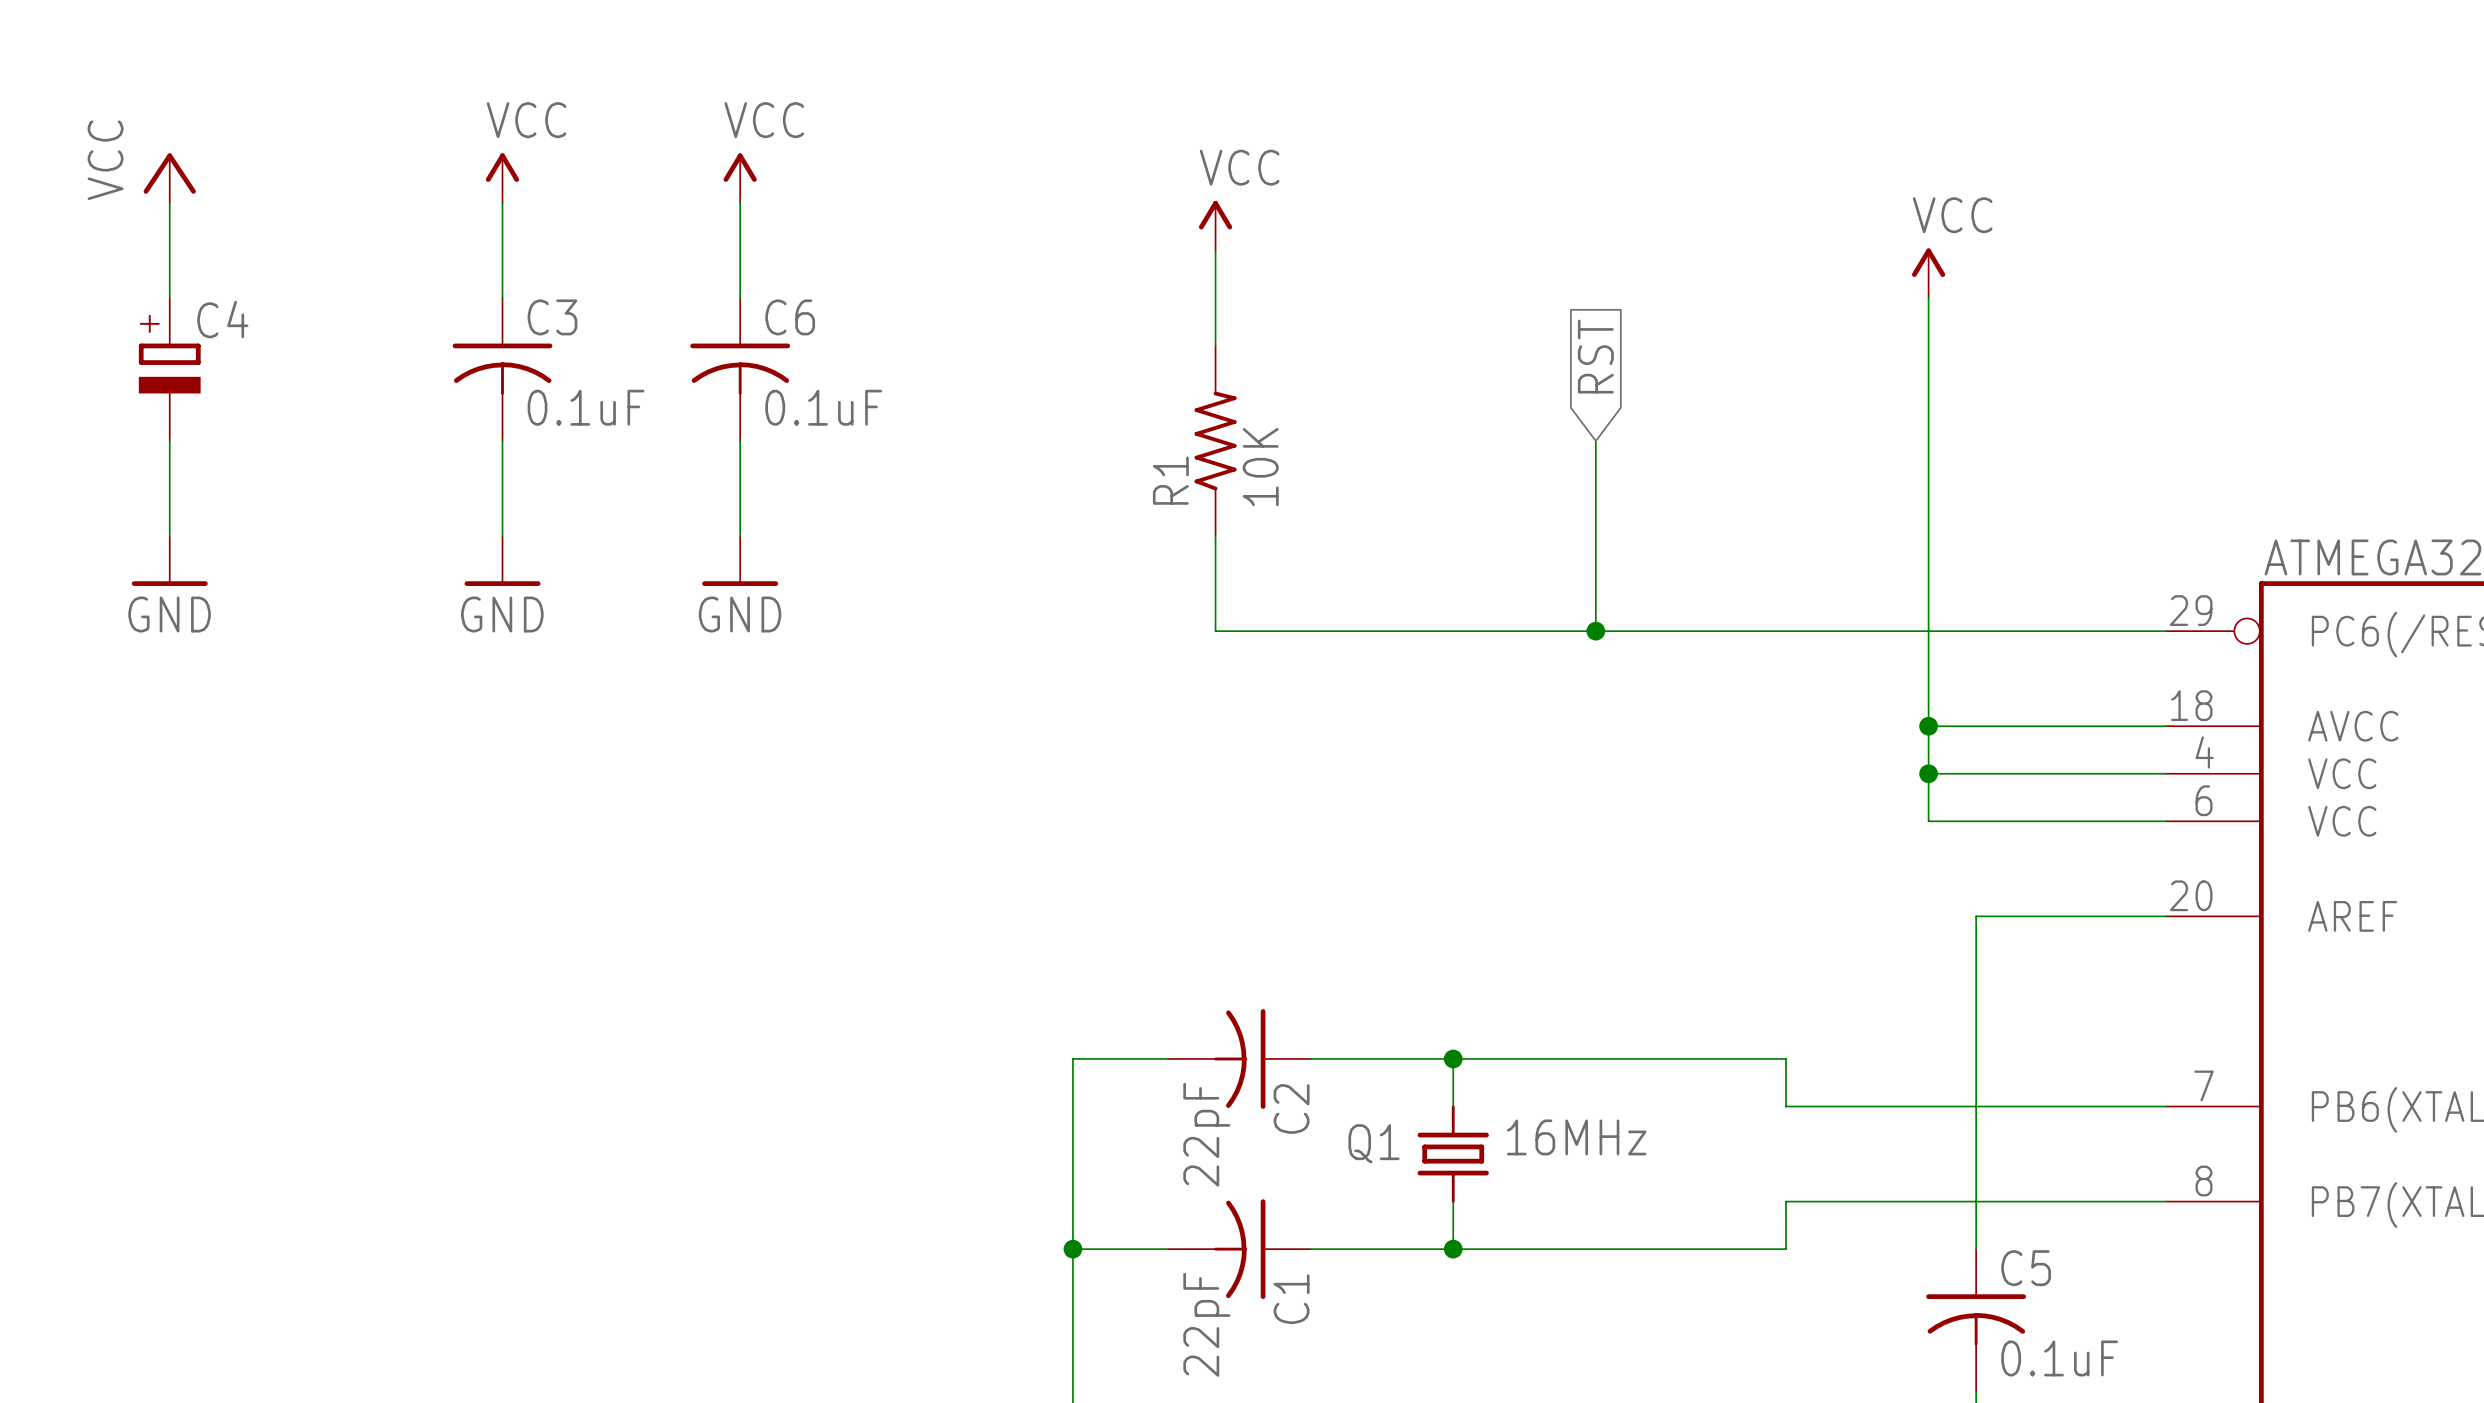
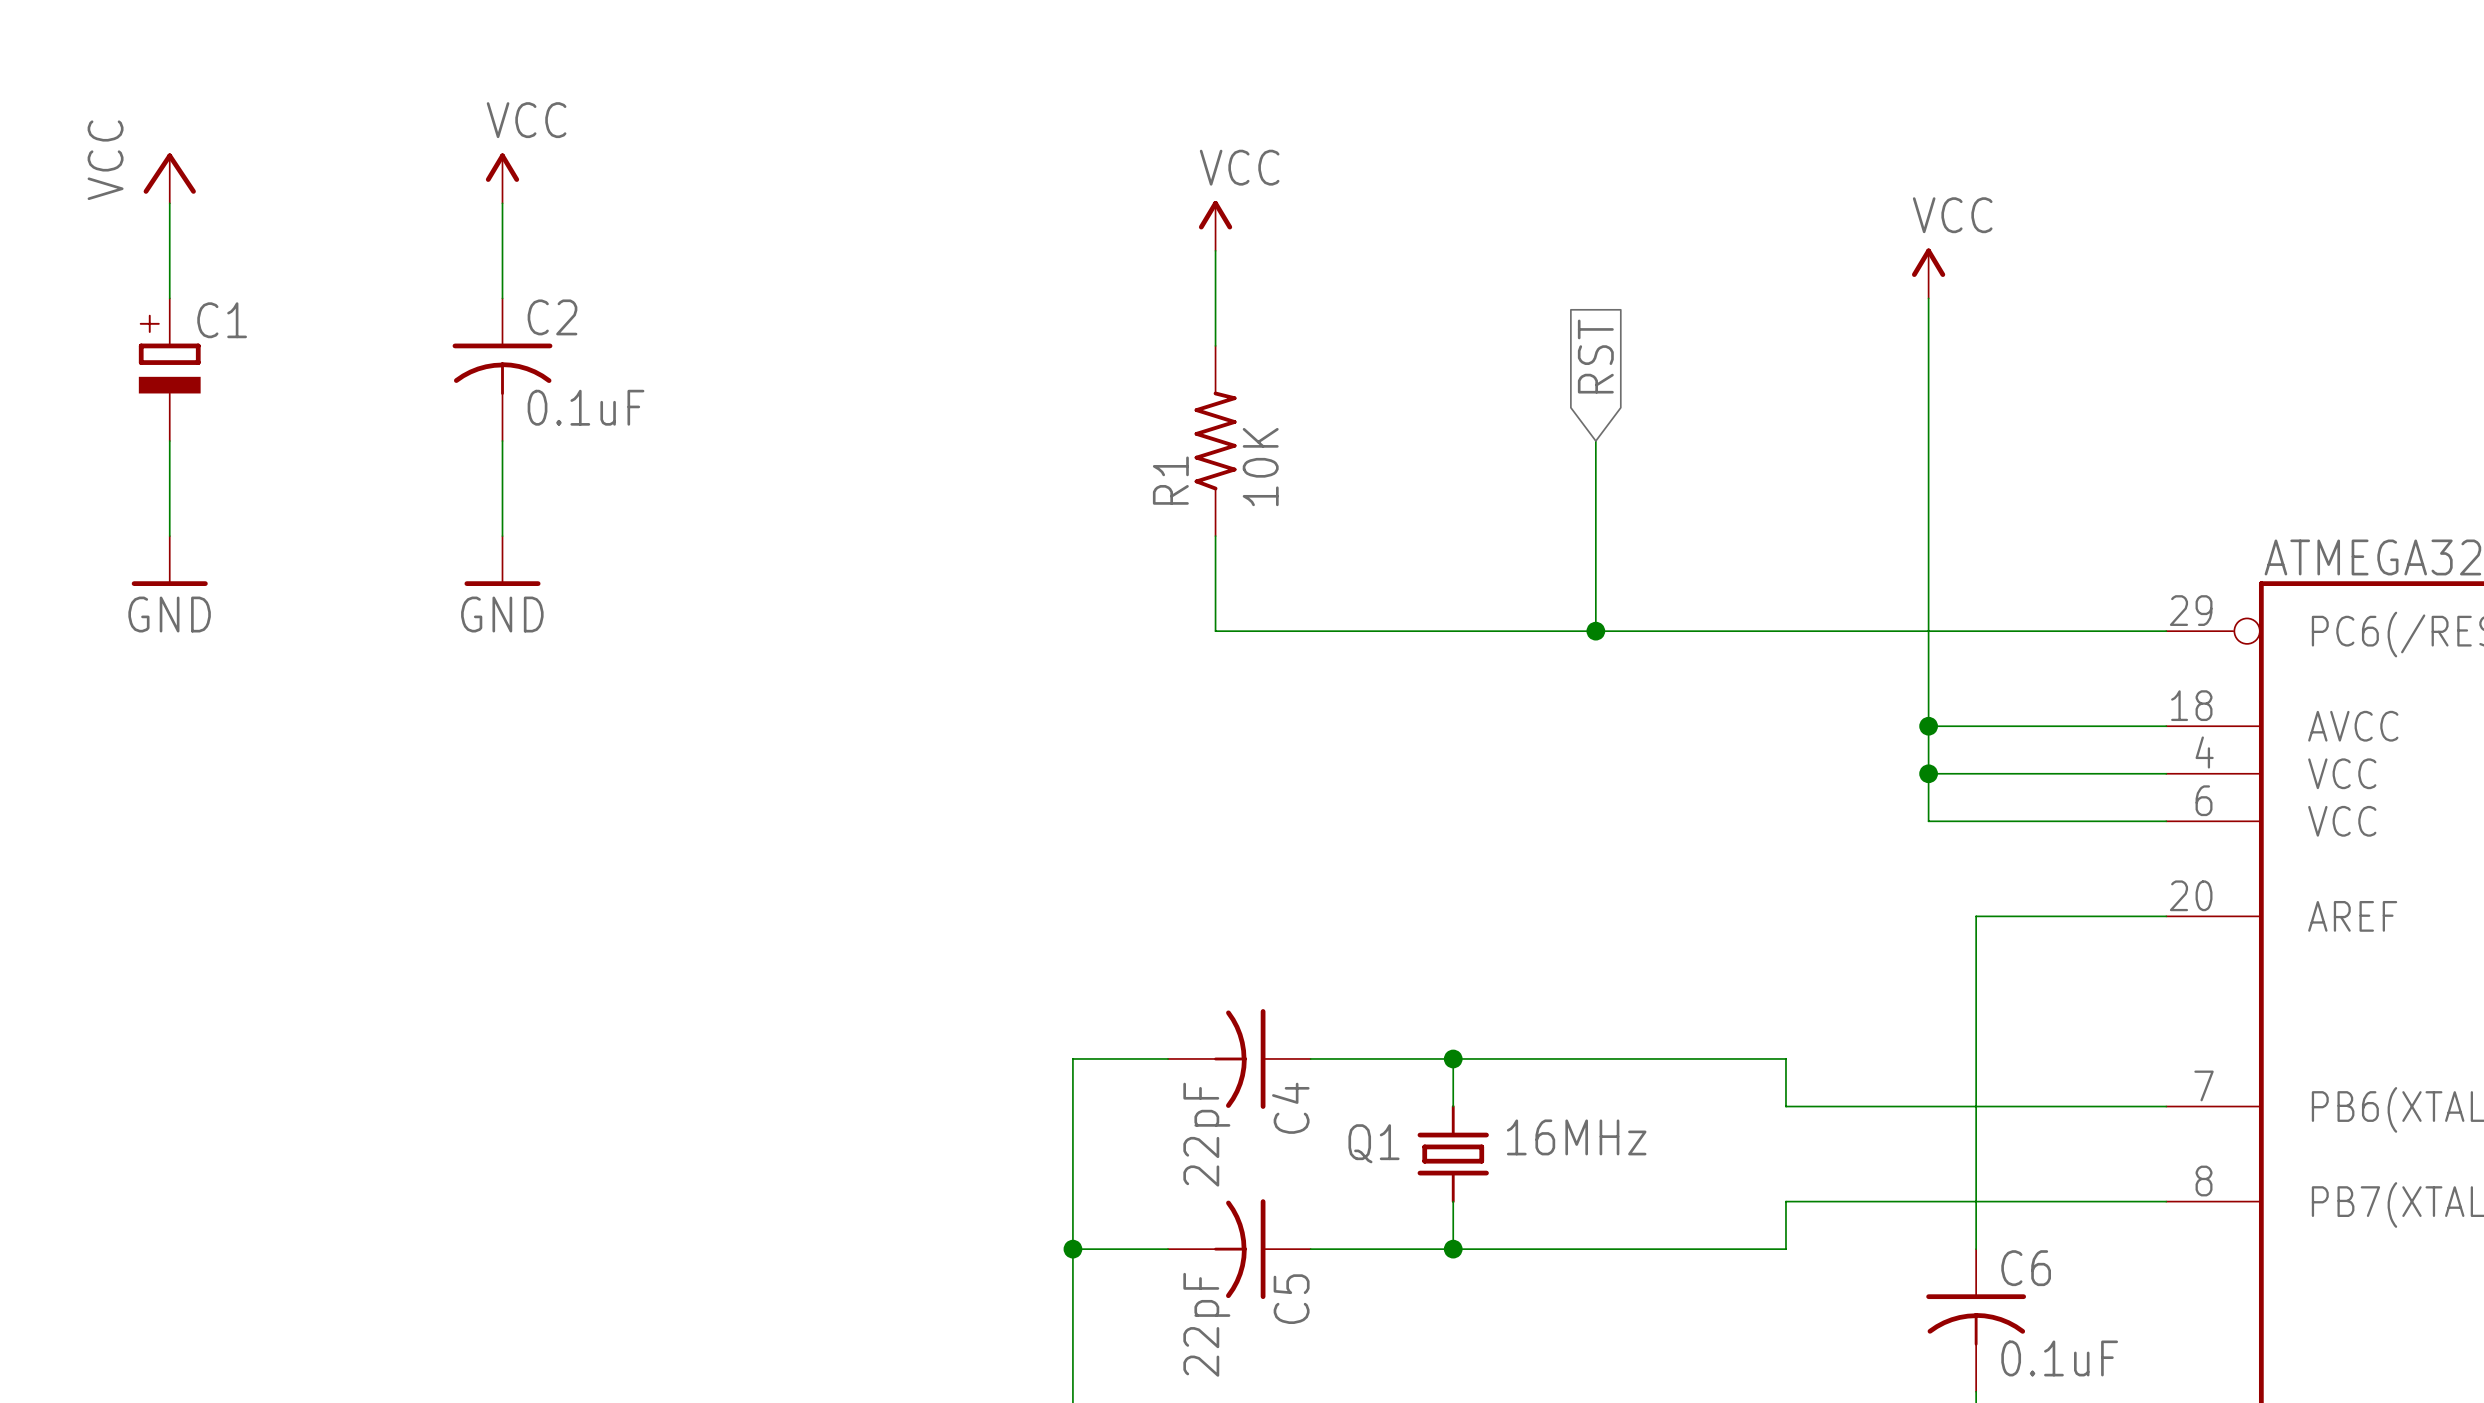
power symbol: VCC (740, 178) -> none
wire: (740, 203) (740, 298) -> none
C3 name: C3 (552, 317) -> C2 (552, 317)
C4 name: C4 (222, 319) -> C1 (222, 320)
C6: 0.1uF (740, 369) -> none
wire: (740, 441) (740, 536) -> none
power symbol: GND (740, 561) -> none
C2 name: C2 (1291, 1108) -> C4 (1290, 1108)
C5 name: C5 (2026, 1268) -> C6 (2026, 1268)
C1 name: C1 (1291, 1299) -> C5 (1291, 1299)

